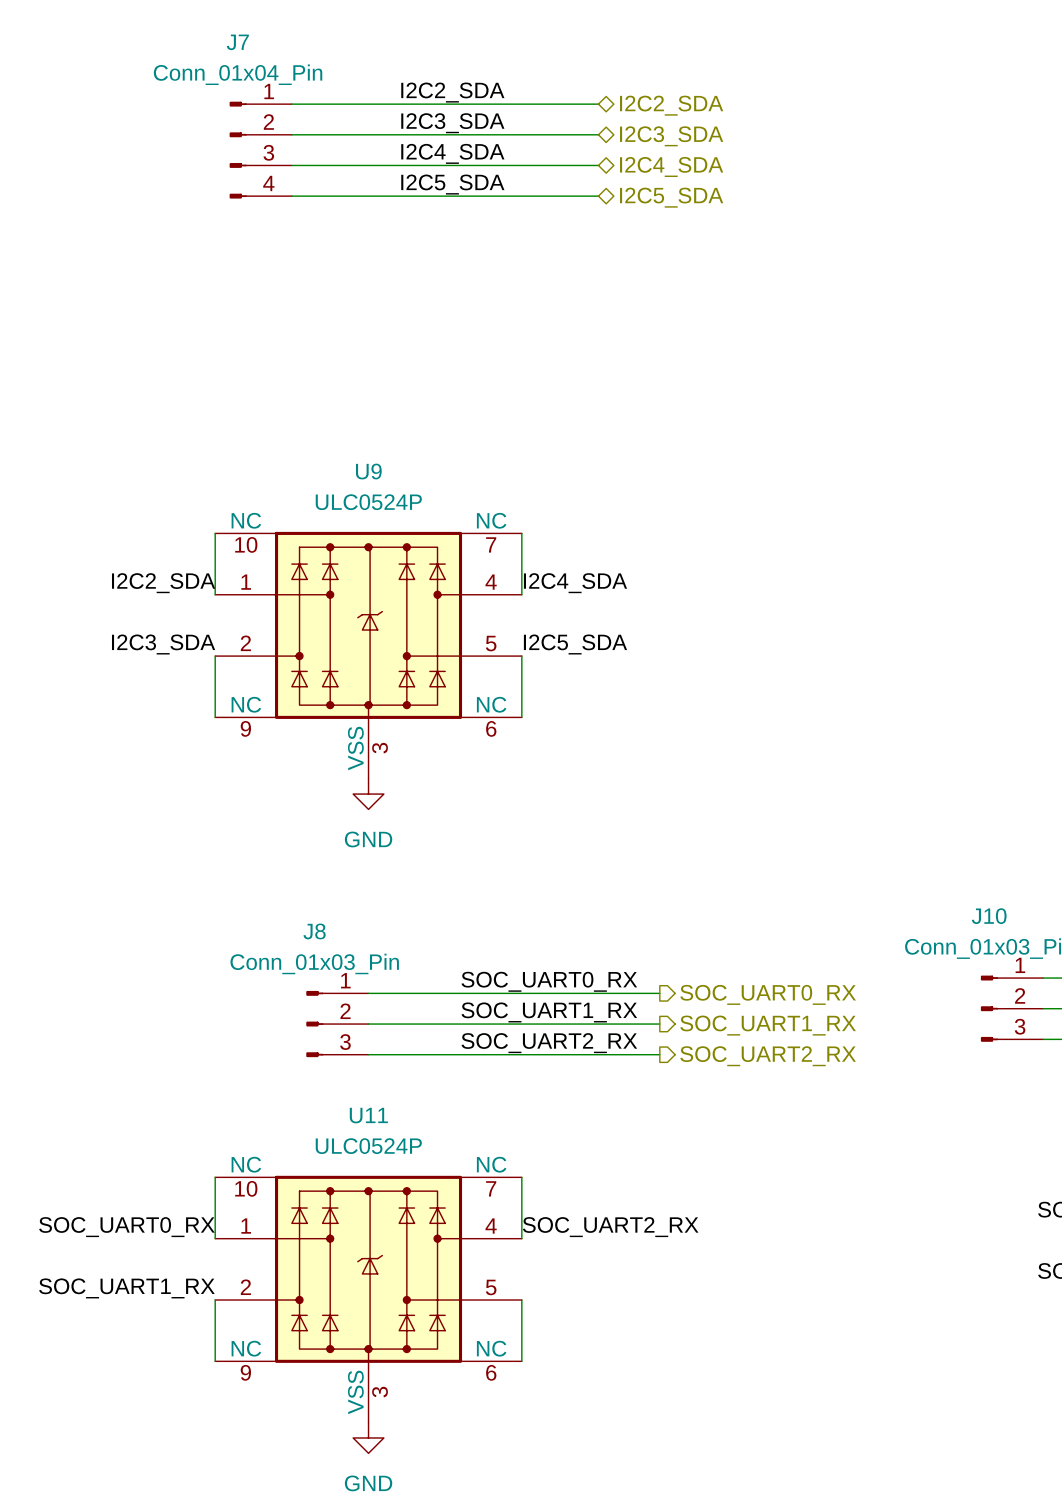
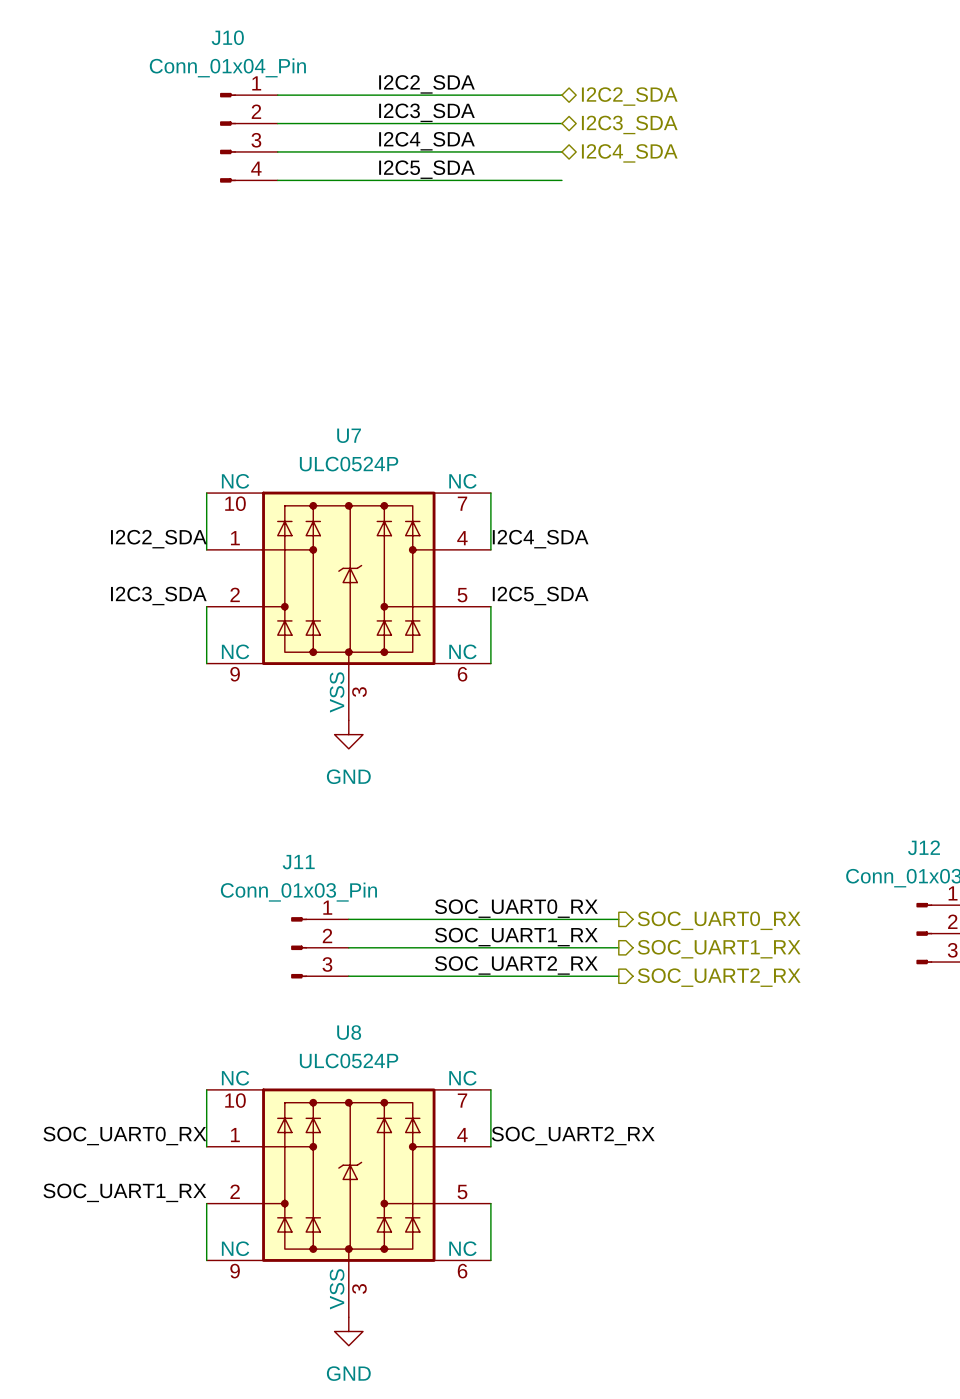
J7 name: J7 (237, 42) -> J10 (227, 37)
hierarchical label: I2C5_SDA (671, 197) -> none
U9 name: U9 (368, 471) -> U7 (349, 435)
J10 name: J10 (989, 916) -> J12 (923, 847)
J8 name: J8 (314, 931) -> J11 (298, 862)
U11 name: U11 (368, 1115) -> U8 (349, 1032)

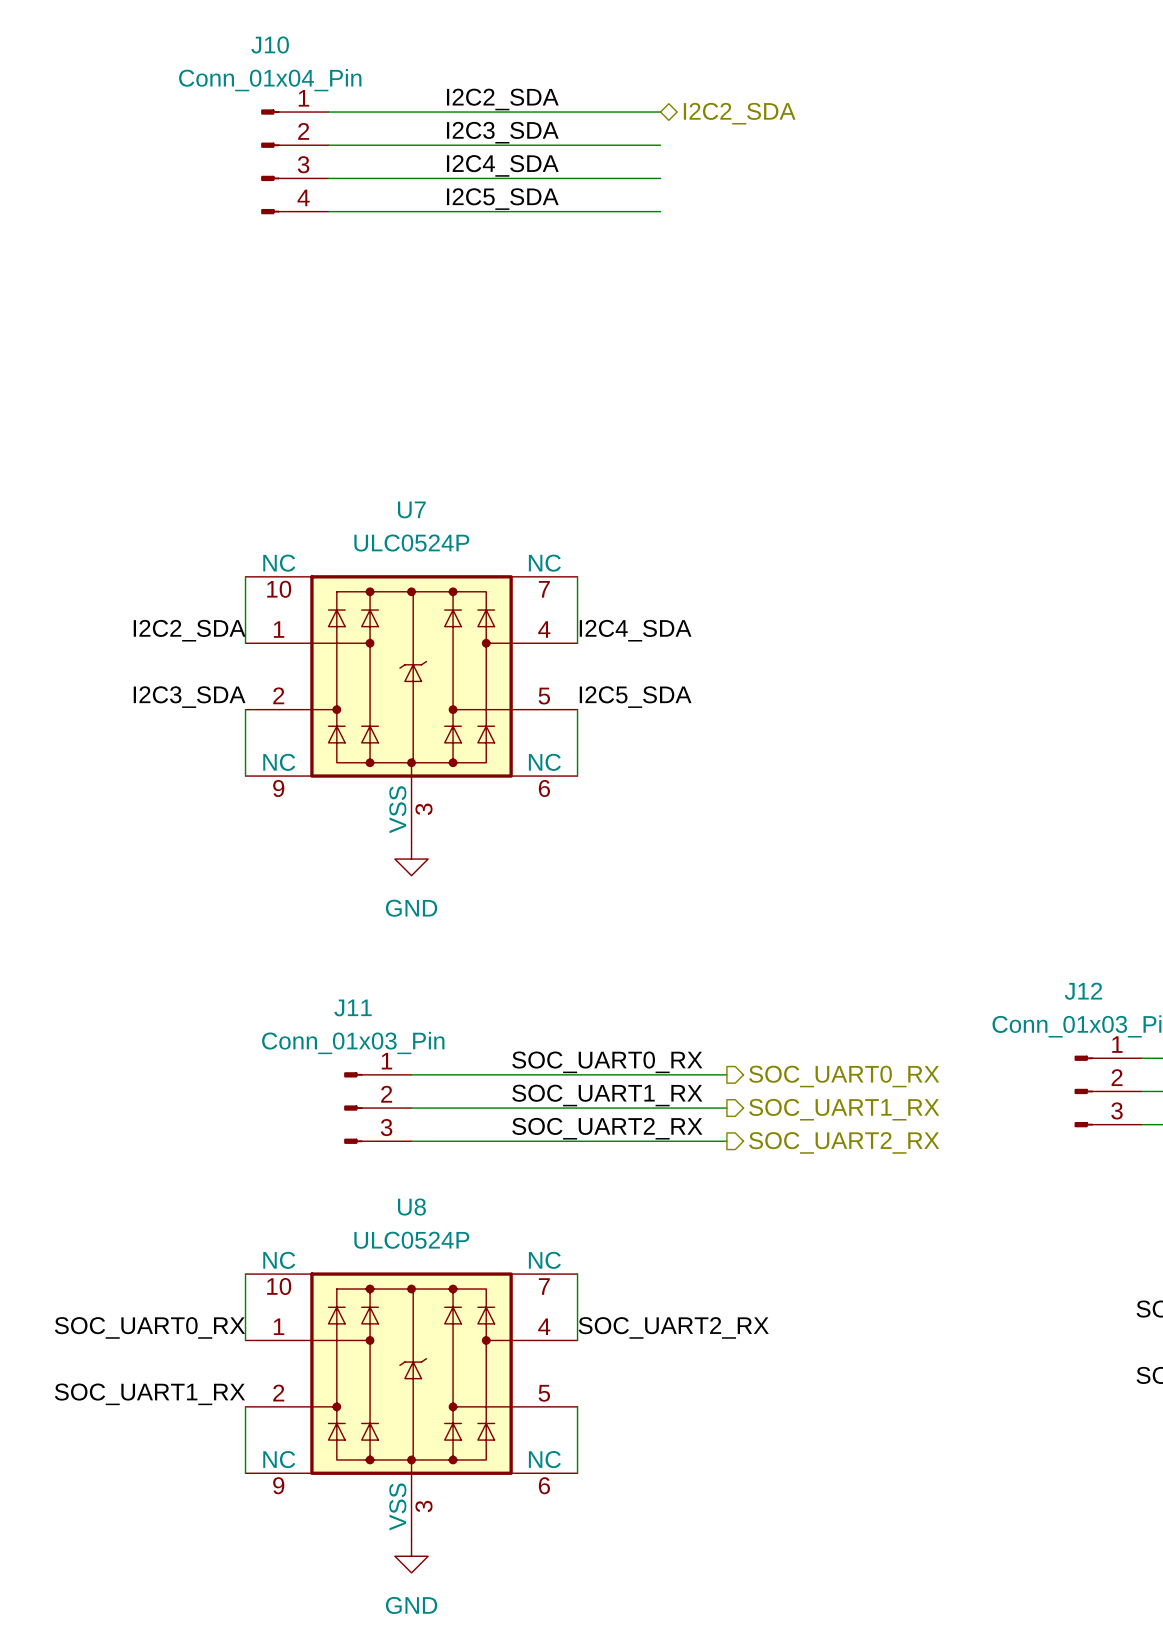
hierarchical label: I2C3_SDA (629, 124) -> none
hierarchical label: I2C4_SDA (629, 153) -> none

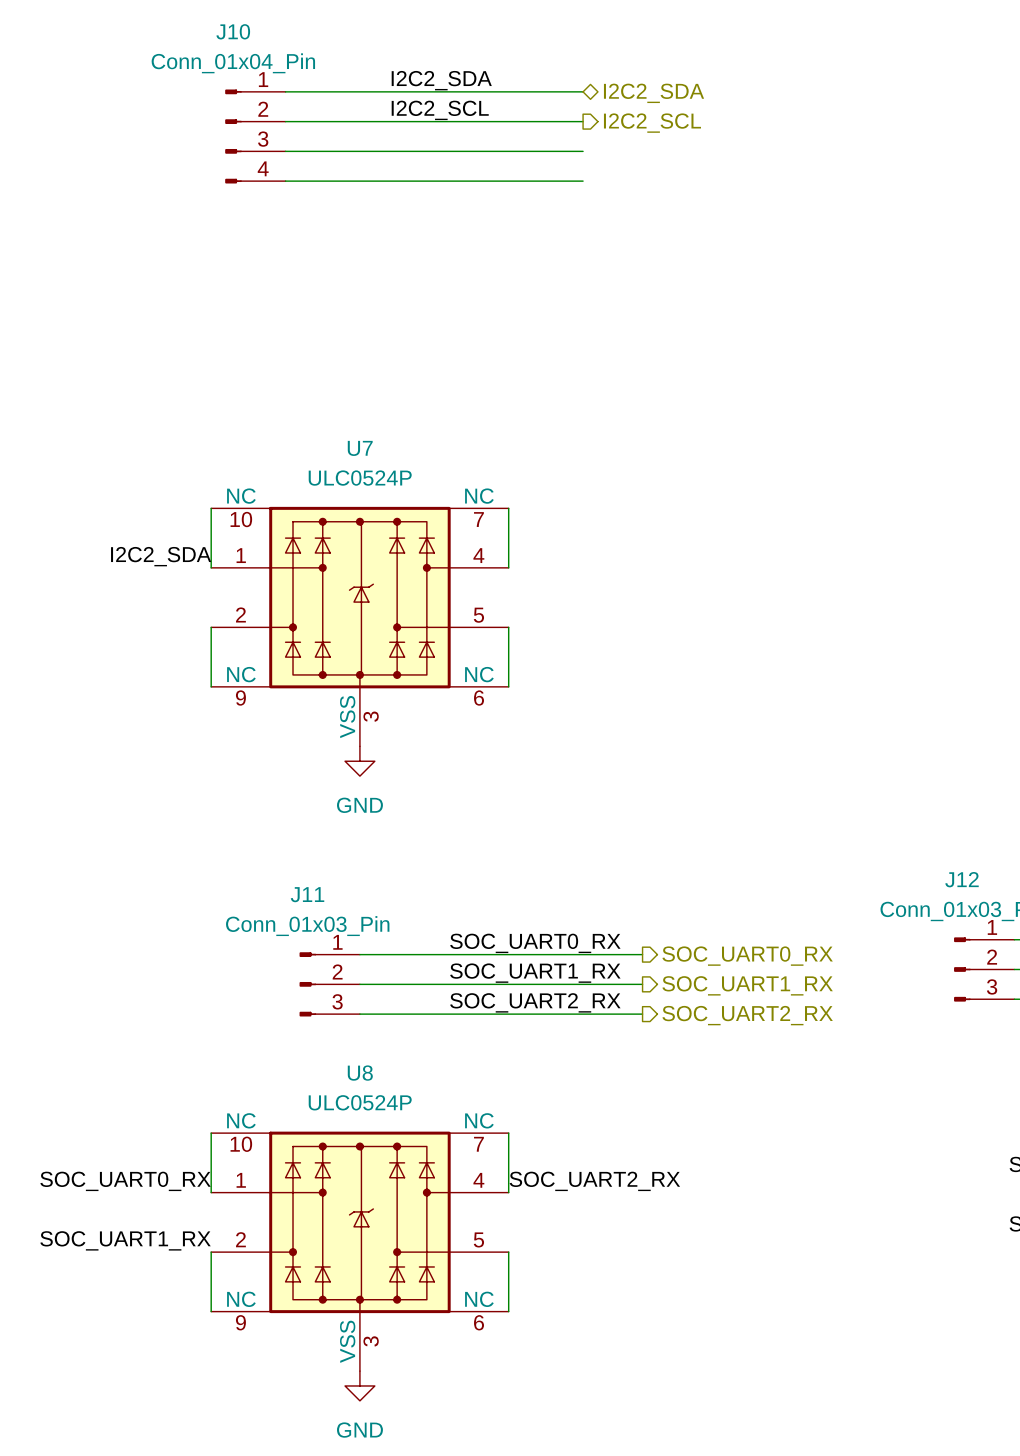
label: I2C3_SDA (502, 132) -> I2C2_SCL (440, 110)
hierarchical label: none -> I2C2_SCL (652, 123)
label: I2C4_SDA (502, 165) -> none
label: I2C5_SDA (502, 199) -> none
label: I2C4_SDA (635, 630) -> none
label: I2C3_SDA (189, 697) -> none
label: I2C5_SDA (635, 697) -> none

